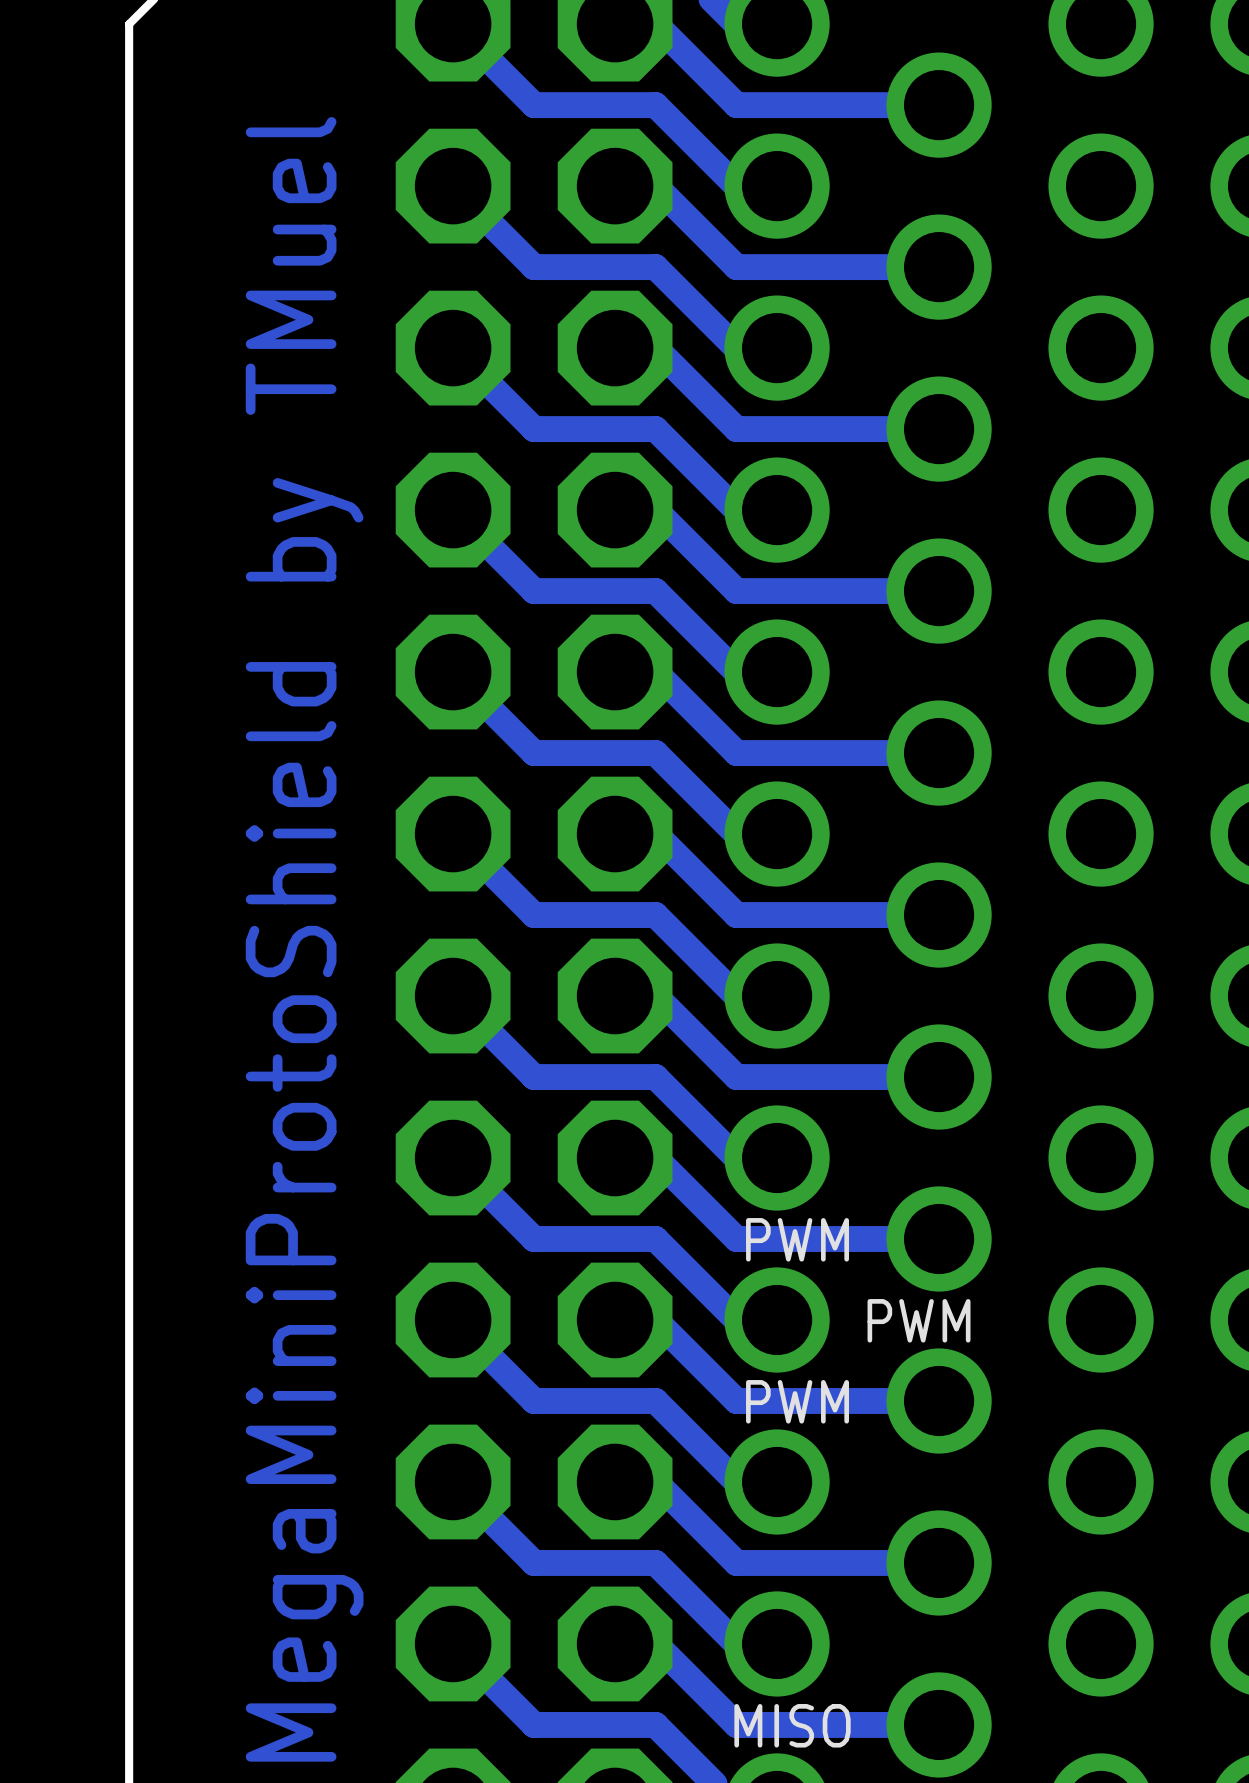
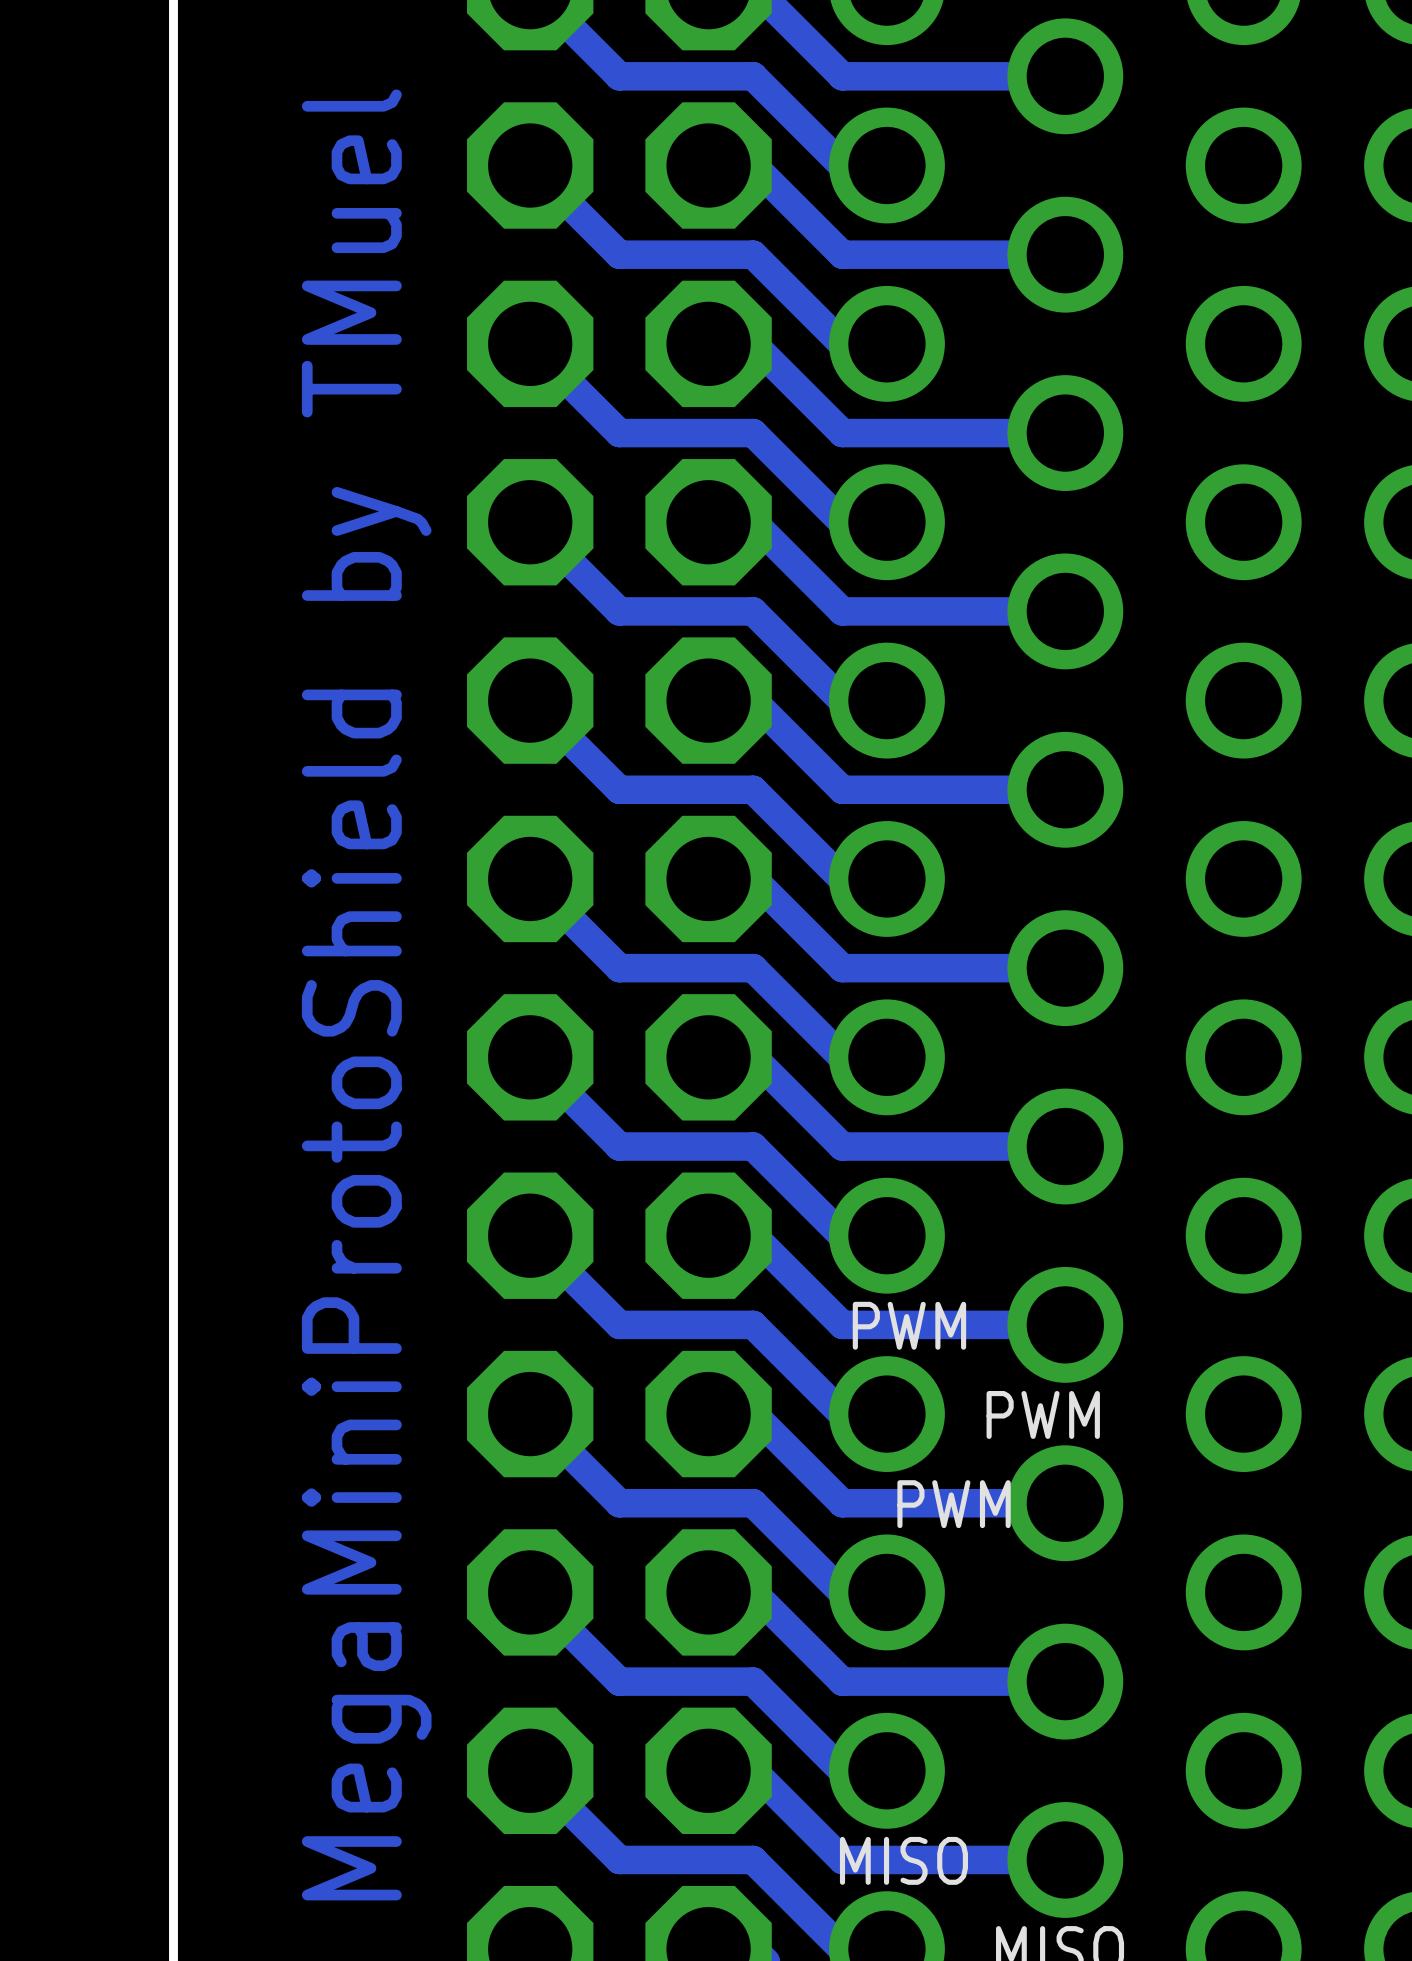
text position: PWM (797, 1401) -> PWM (954, 1504)

